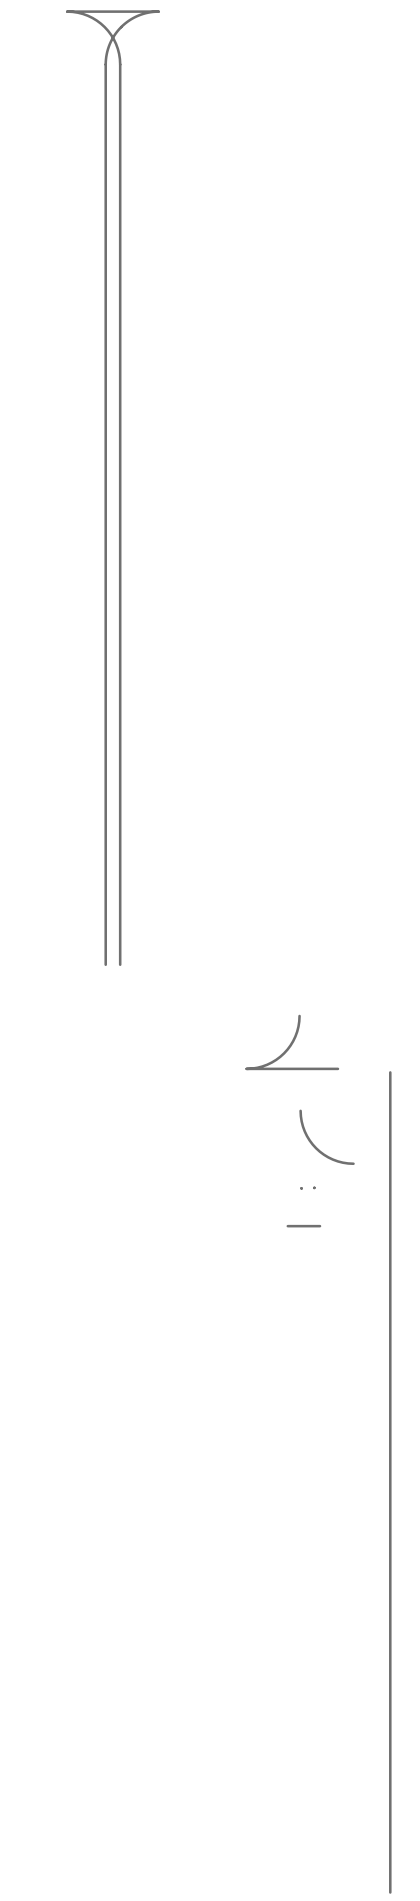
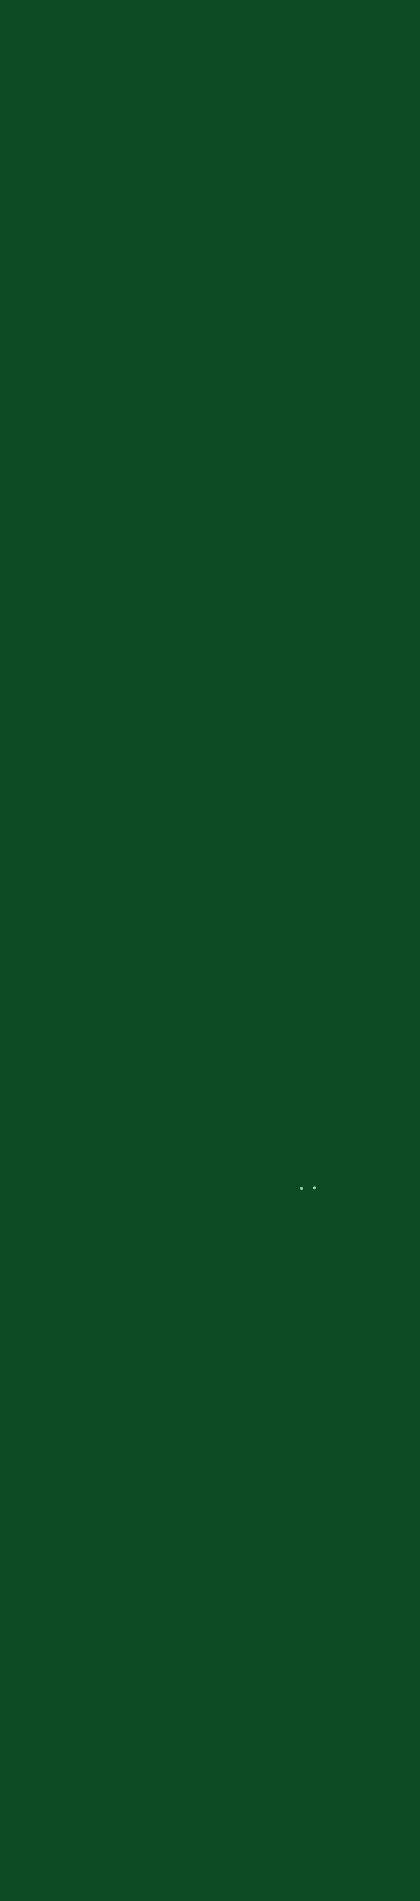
line: (105, 964) (105, 61) (110, 41) (111, 39) (113, 37) (116, 33) (123, 25) (140, 14) (158, 11) (67, 11) (83, 13) (100, 23) (108, 30) (111, 34) (113, 39) (119, 59) (120, 964) -> none
line: (299, 1015) (295, 1036) (284, 1053) (267, 1064) (246, 1068) (337, 1068) -> none
line: (390, 1072) (390, 1892) -> none
line: (300, 1110) (304, 1131) (316, 1148) (332, 1159) (353, 1163) -> none
line: (287, 1226) (320, 1226) -> none

